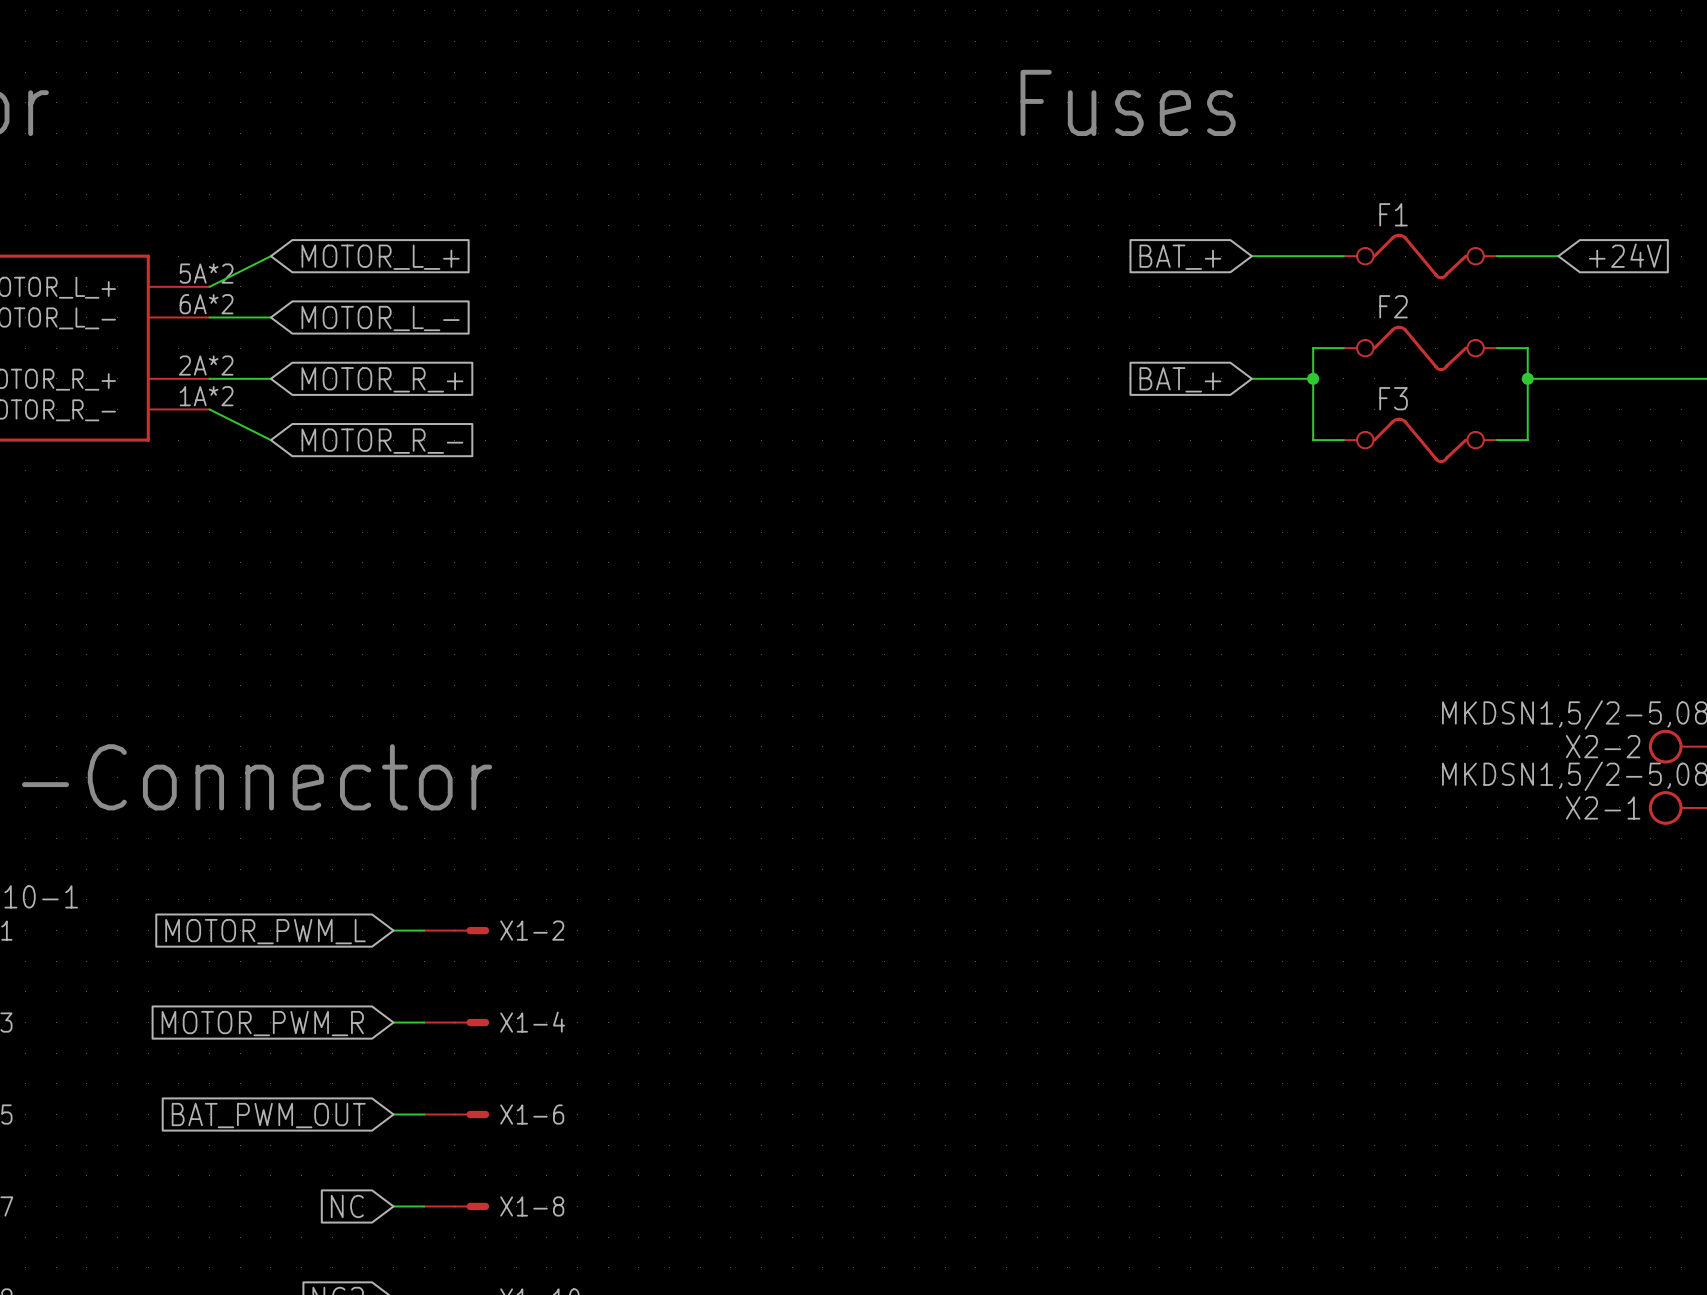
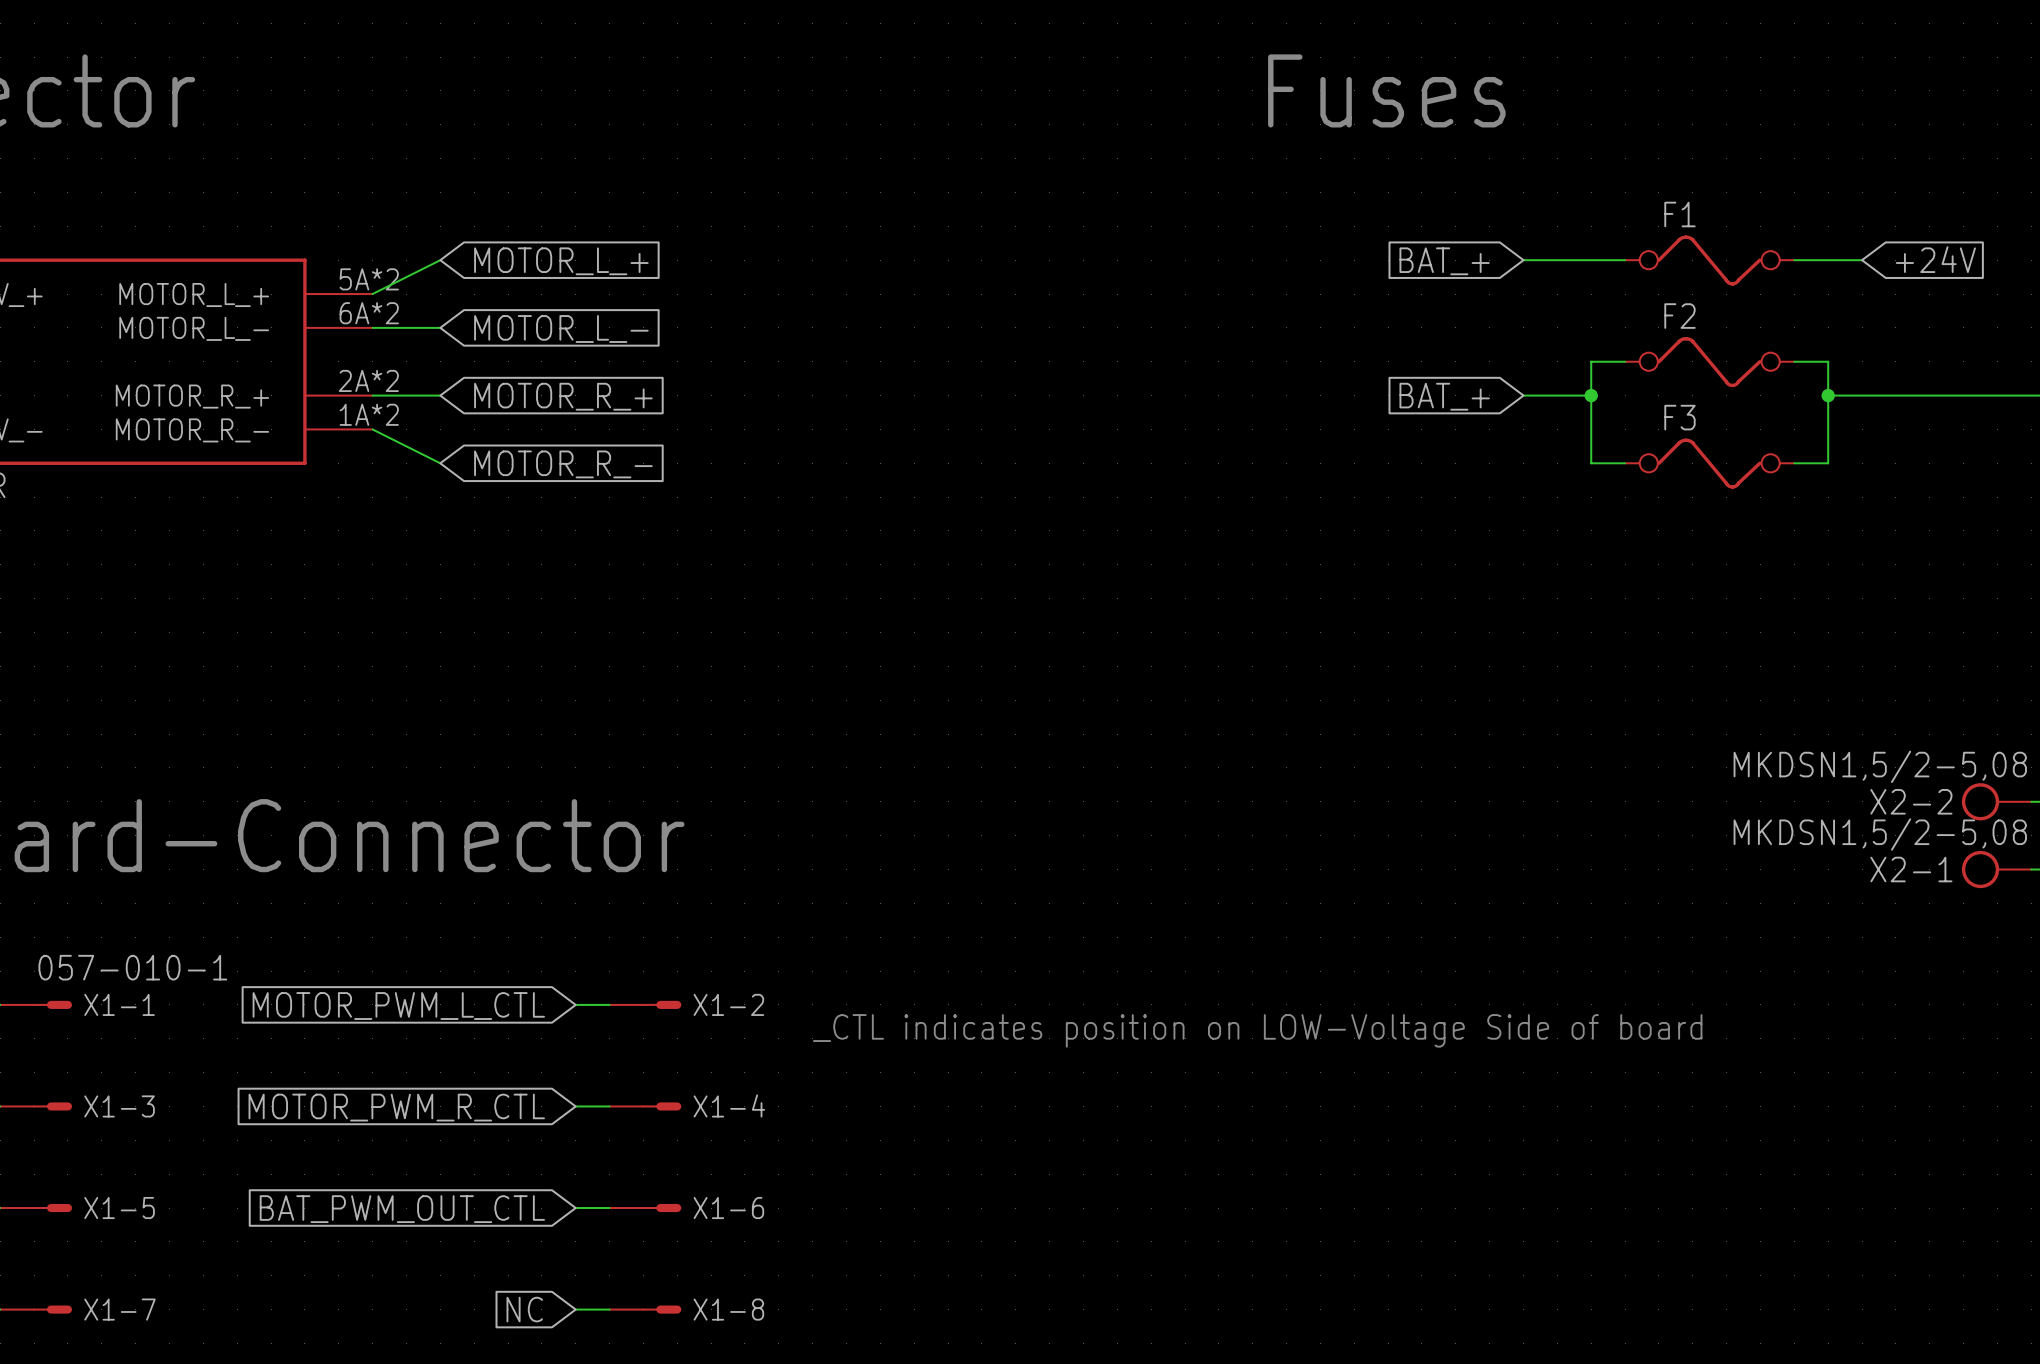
global label: MOTOR_PWM_L (265, 931) -> MOTOR_PWM_L_CTL (398, 1006)
text: none -> _CTL indicates position on LOW-Voltage Side of board (1257, 1030)
global label: MOTOR_PWM_R (262, 1023) -> MOTOR_PWM_R_CTL (396, 1107)
global label: BAT_PWM_OUT (268, 1115) -> BAT_PWM_OUT_CTL (402, 1209)

